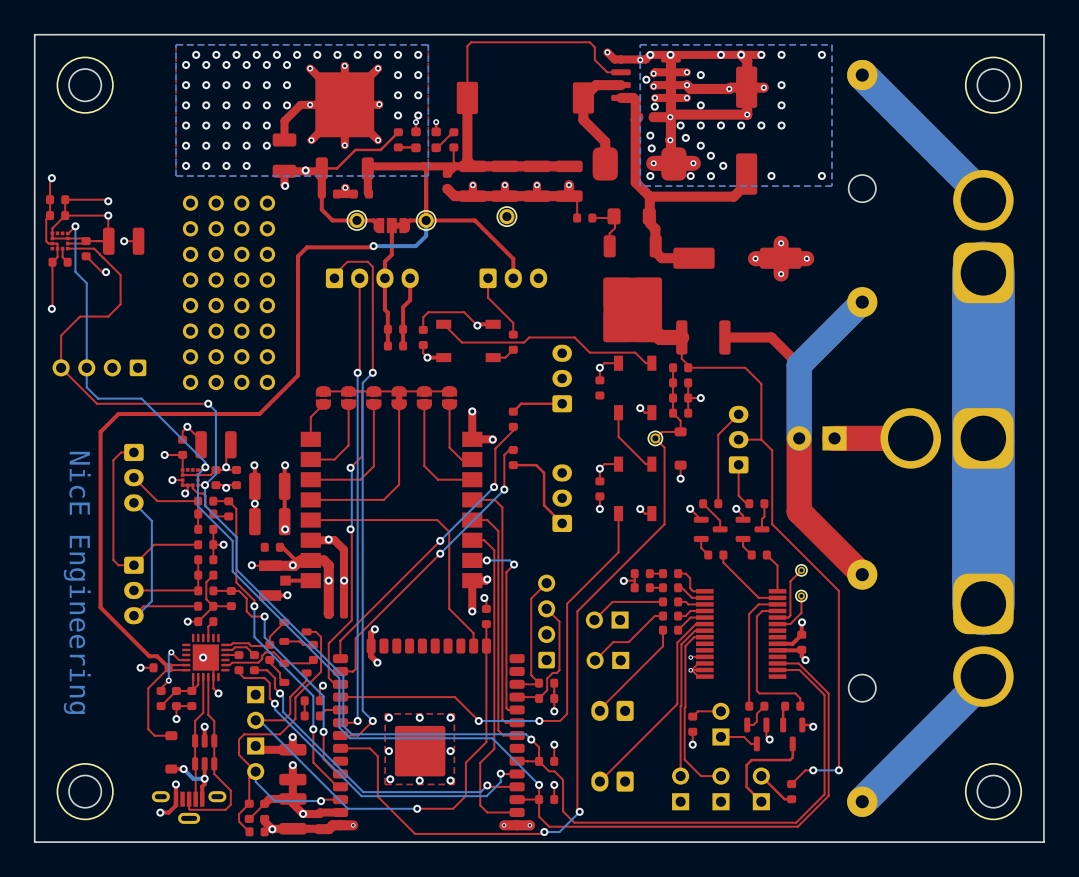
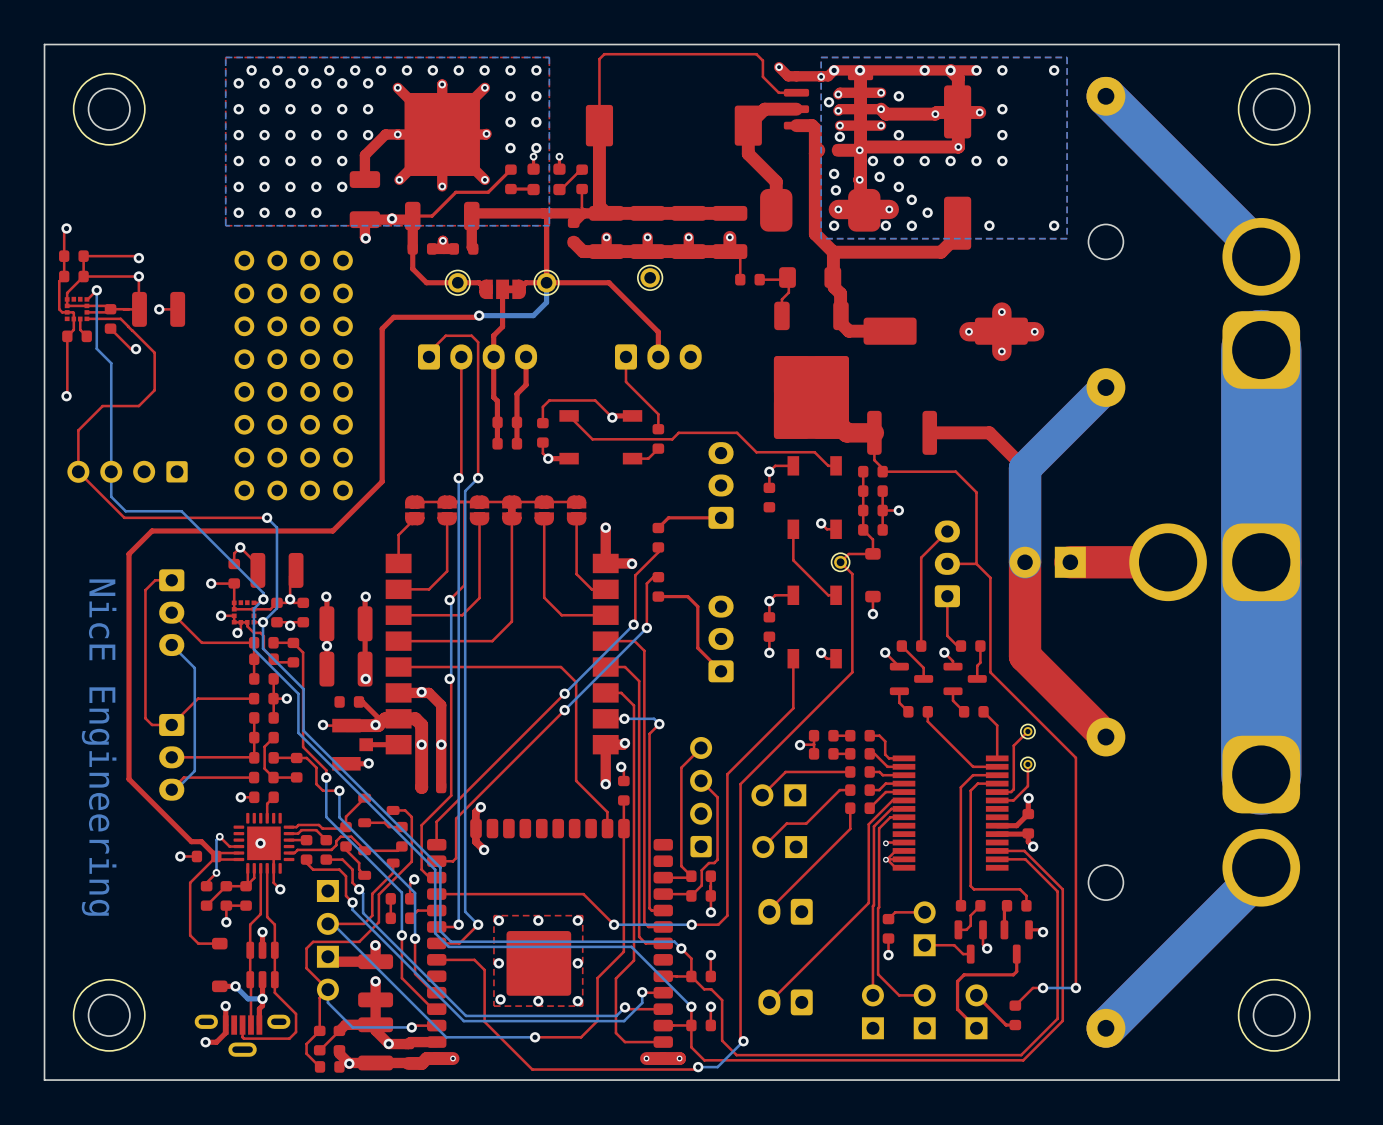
top track: (213, 606) (198, 621) -> none

